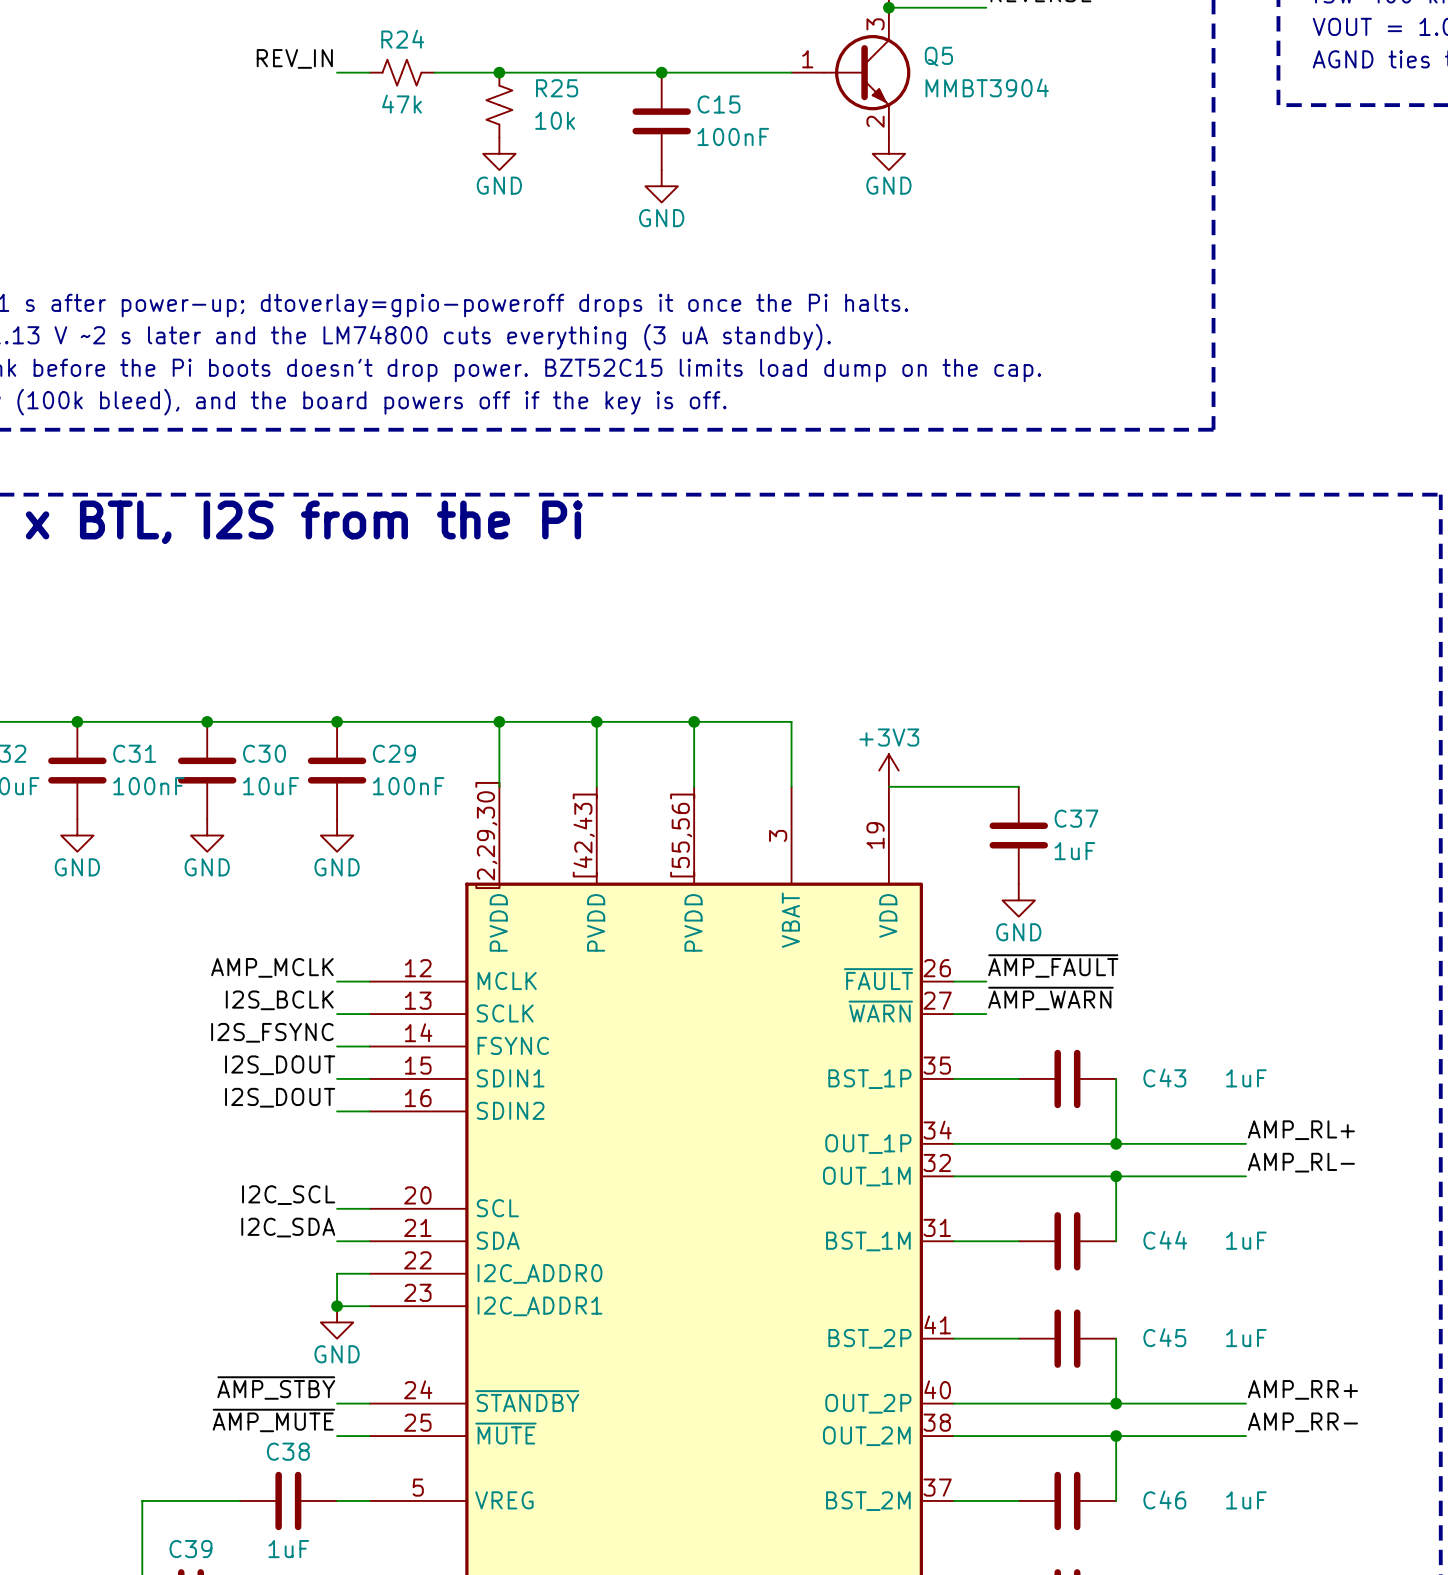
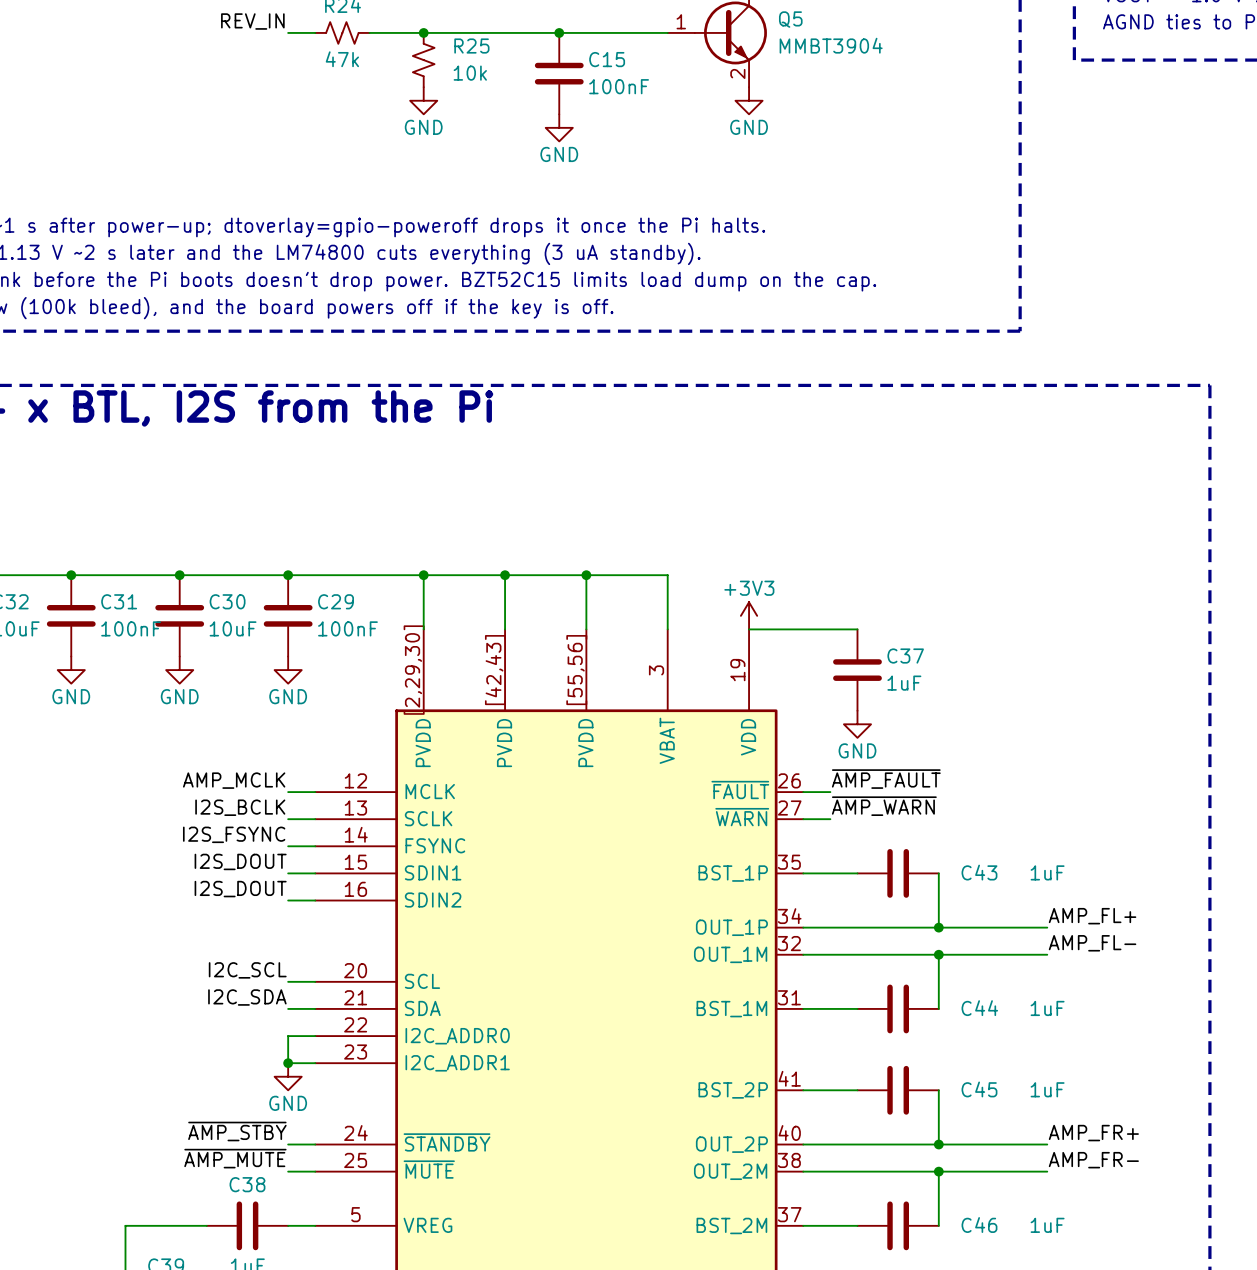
label: AMP_RL+ (1301, 1130) -> AMP_FL+ (1092, 916)
label: AMP_RL- (1301, 1162) -> AMP_FL- (1092, 943)
label: AMP_RR+ (1302, 1389) -> AMP_FR+ (1093, 1133)
label: AMP_RR- (1302, 1422) -> AMP_FR- (1093, 1160)

